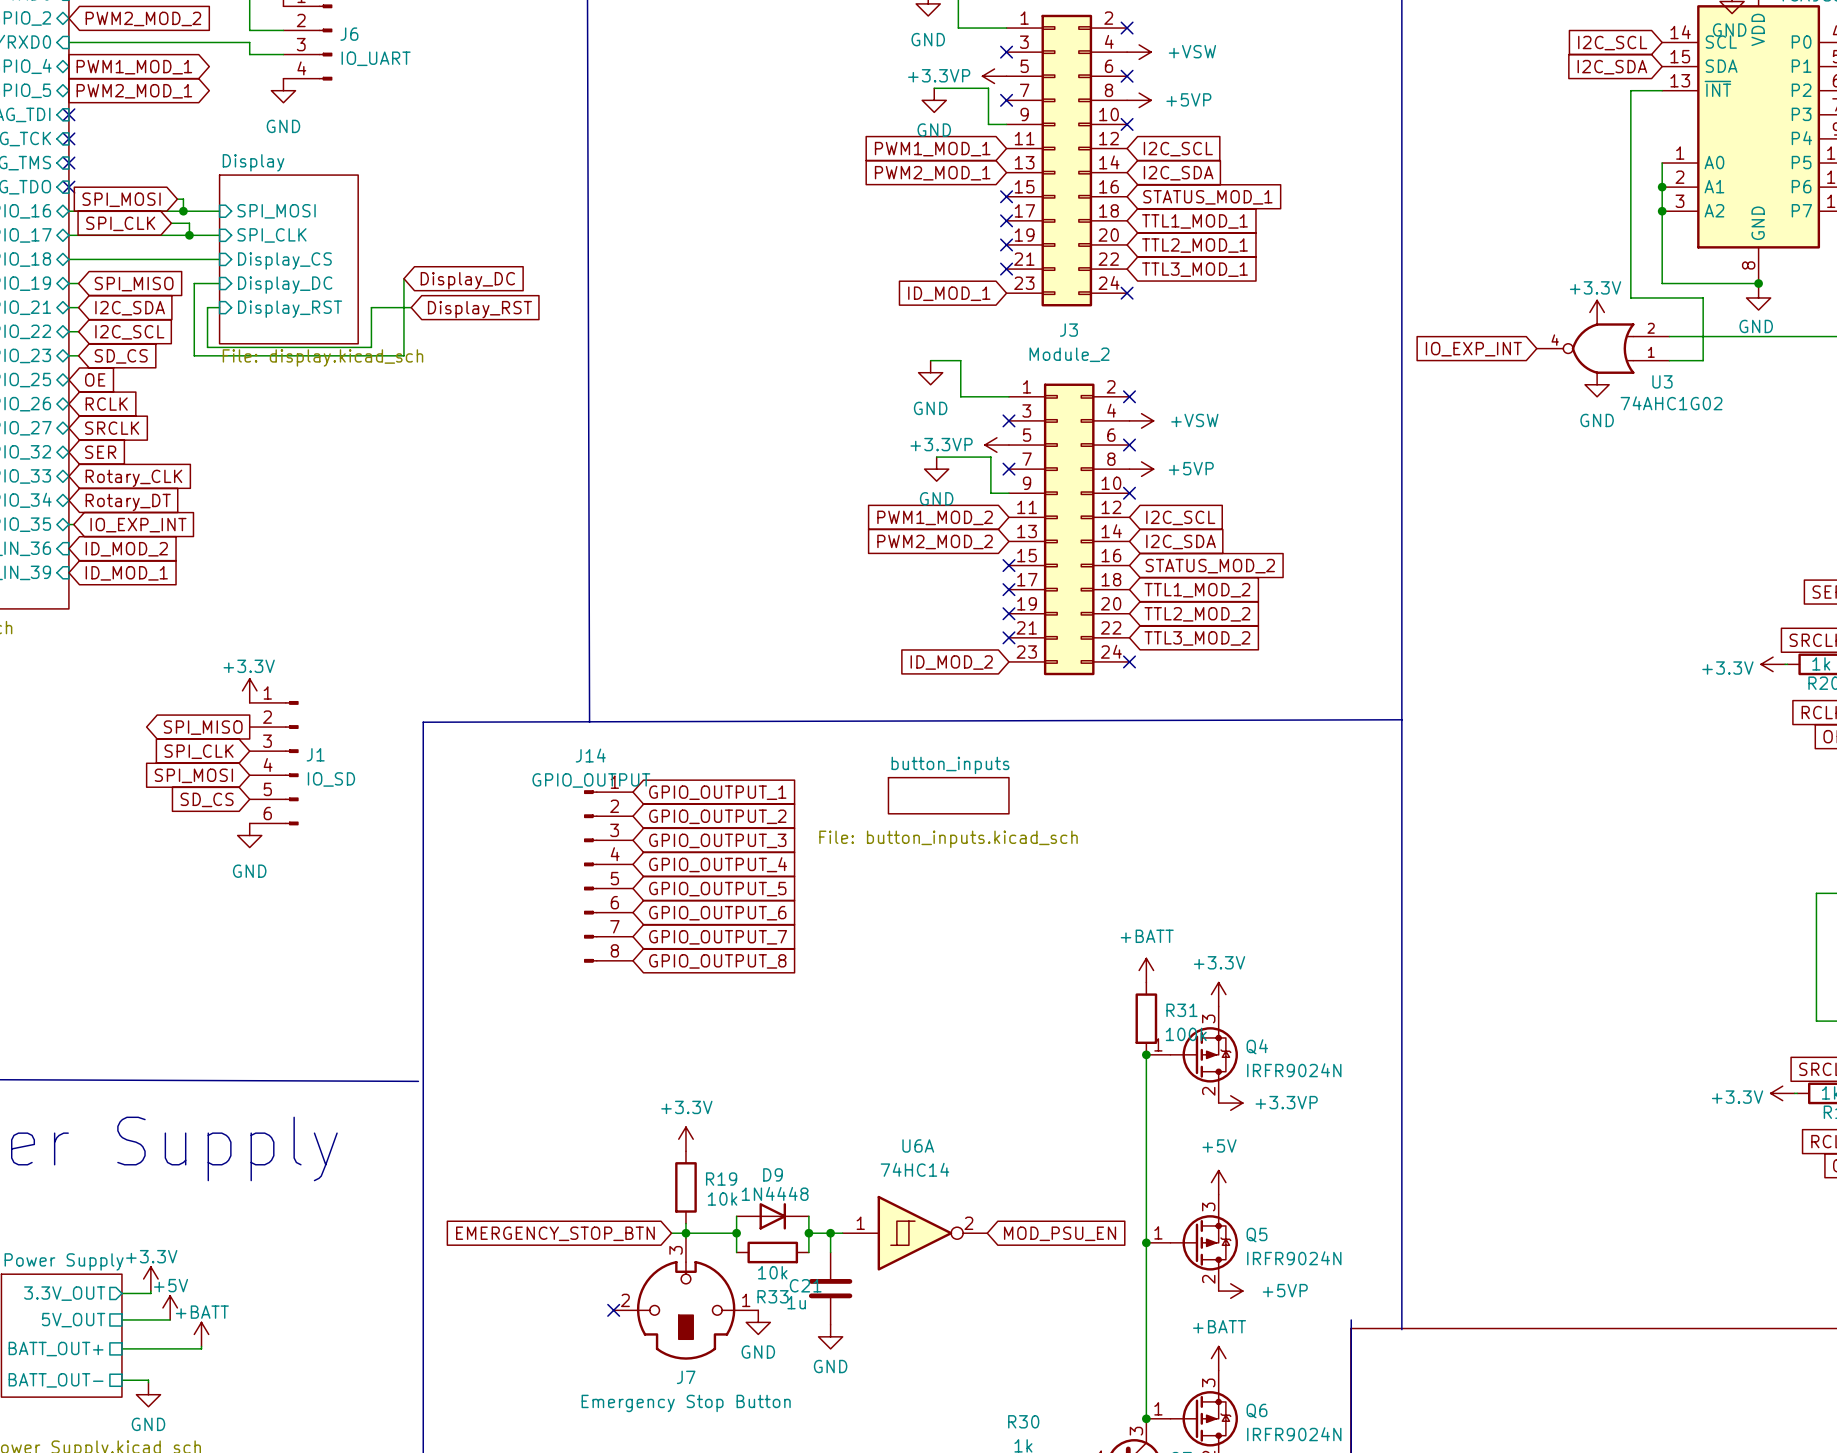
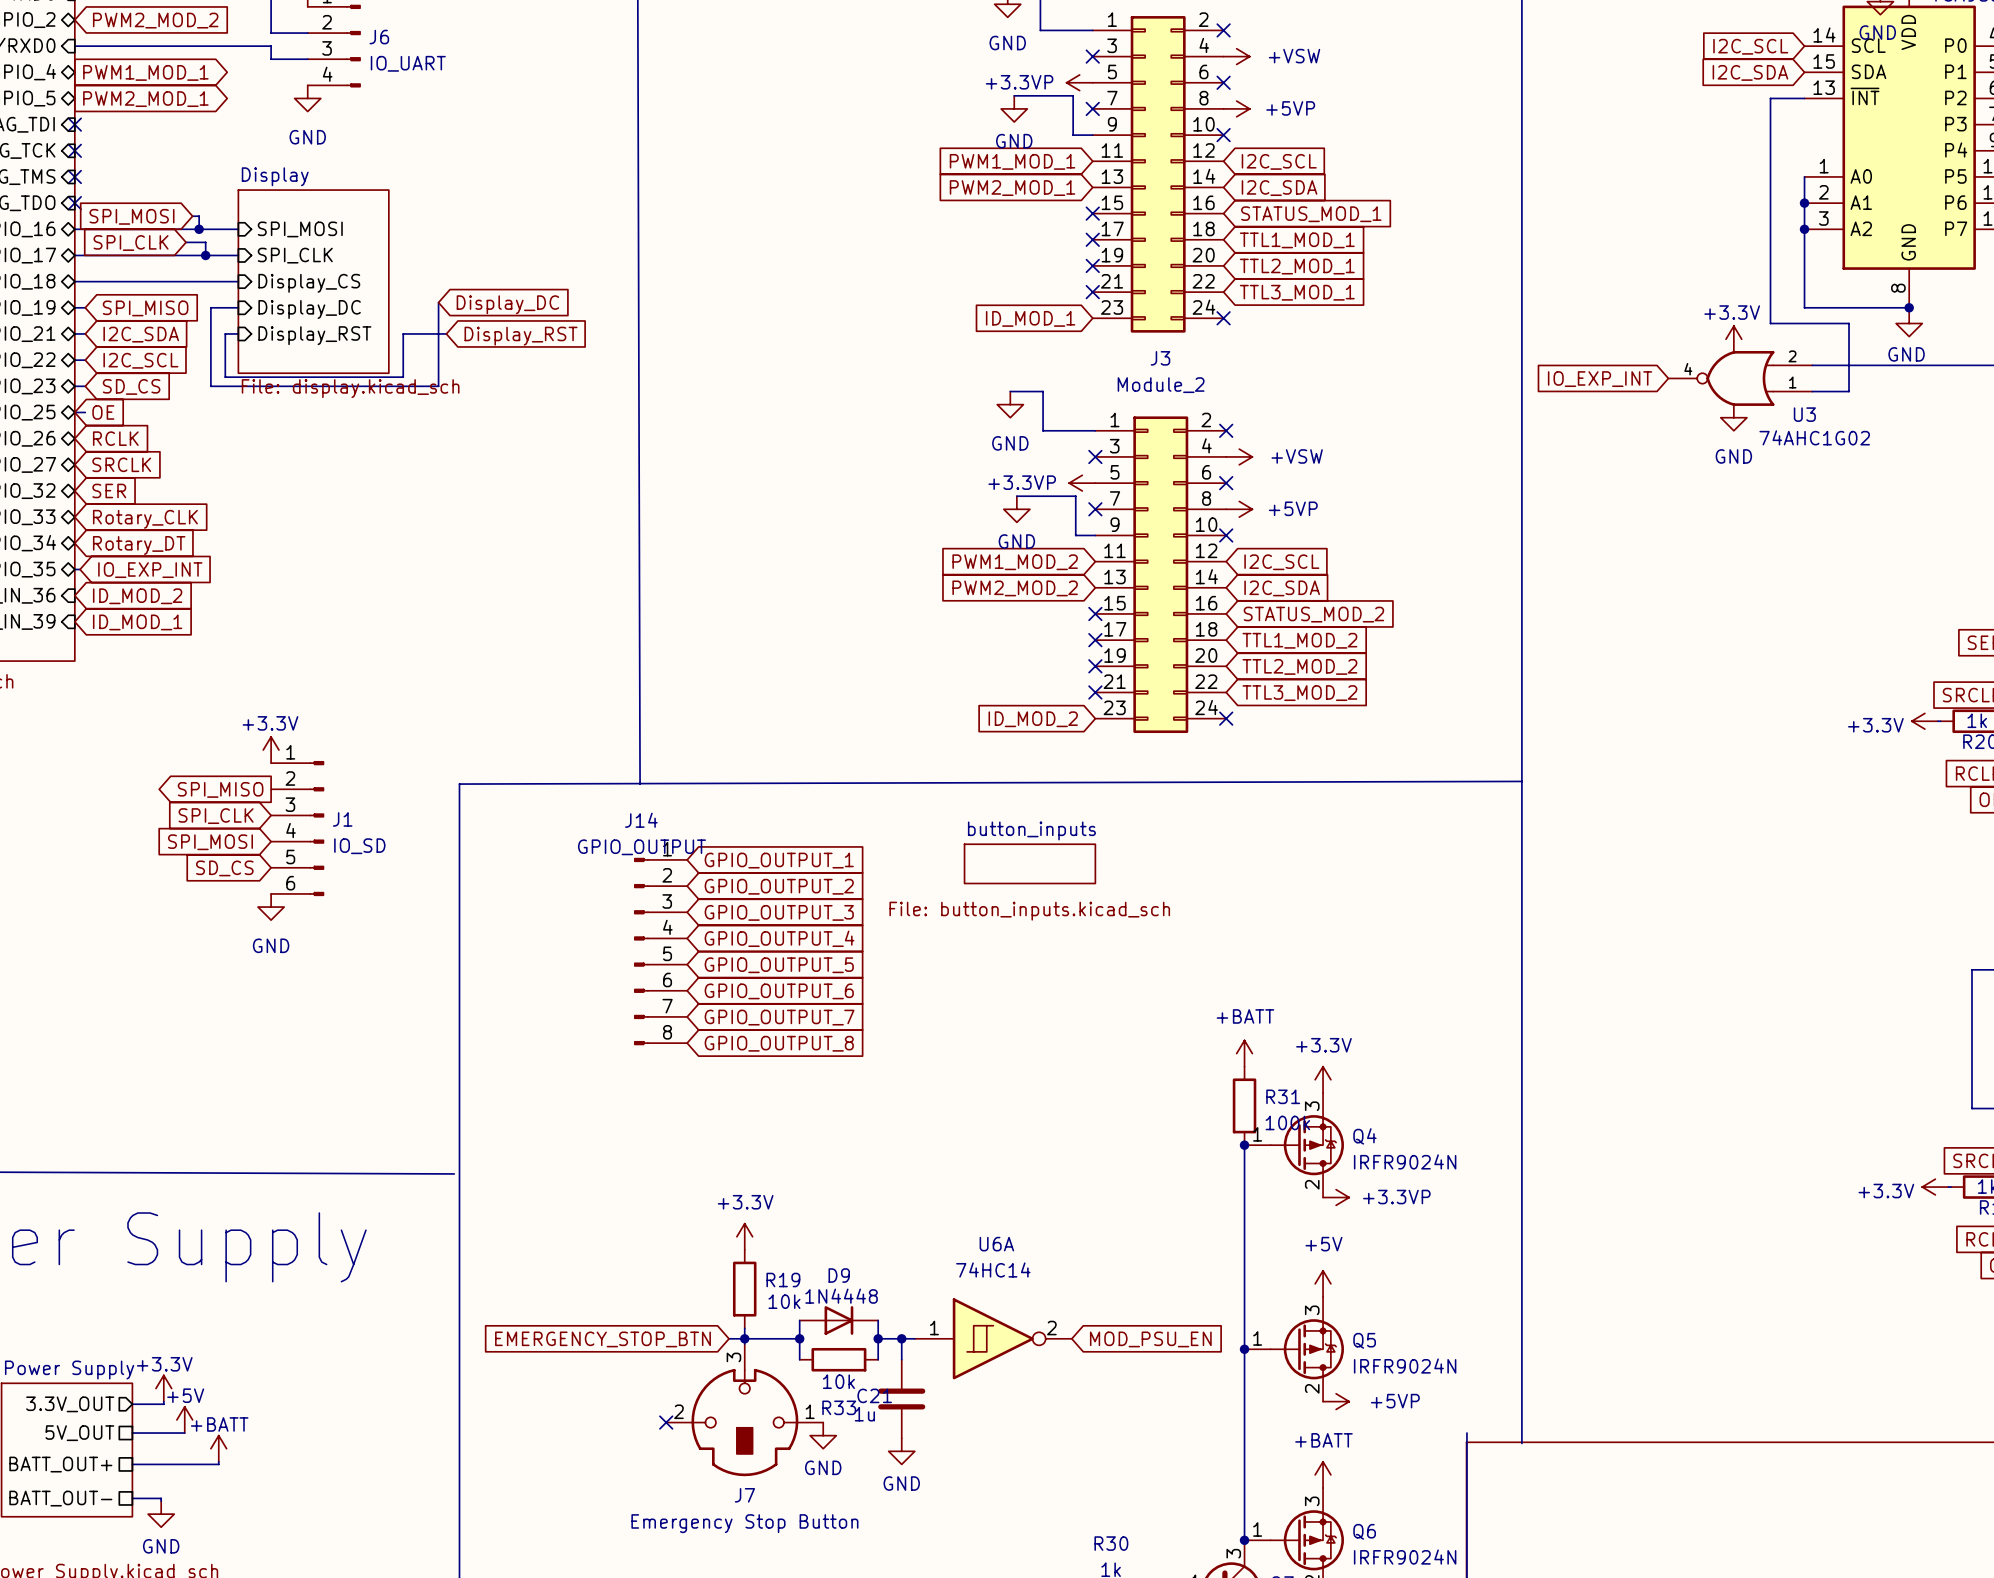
wire: none -> (74, 412) (85, 412)

